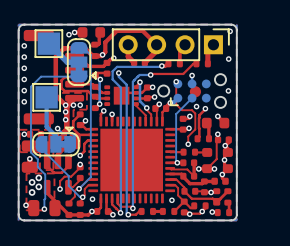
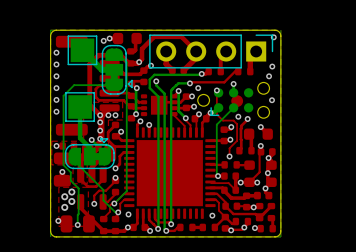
via: none -> (269, 76)
via: none -> (198, 88)
via: none -> (100, 138)

